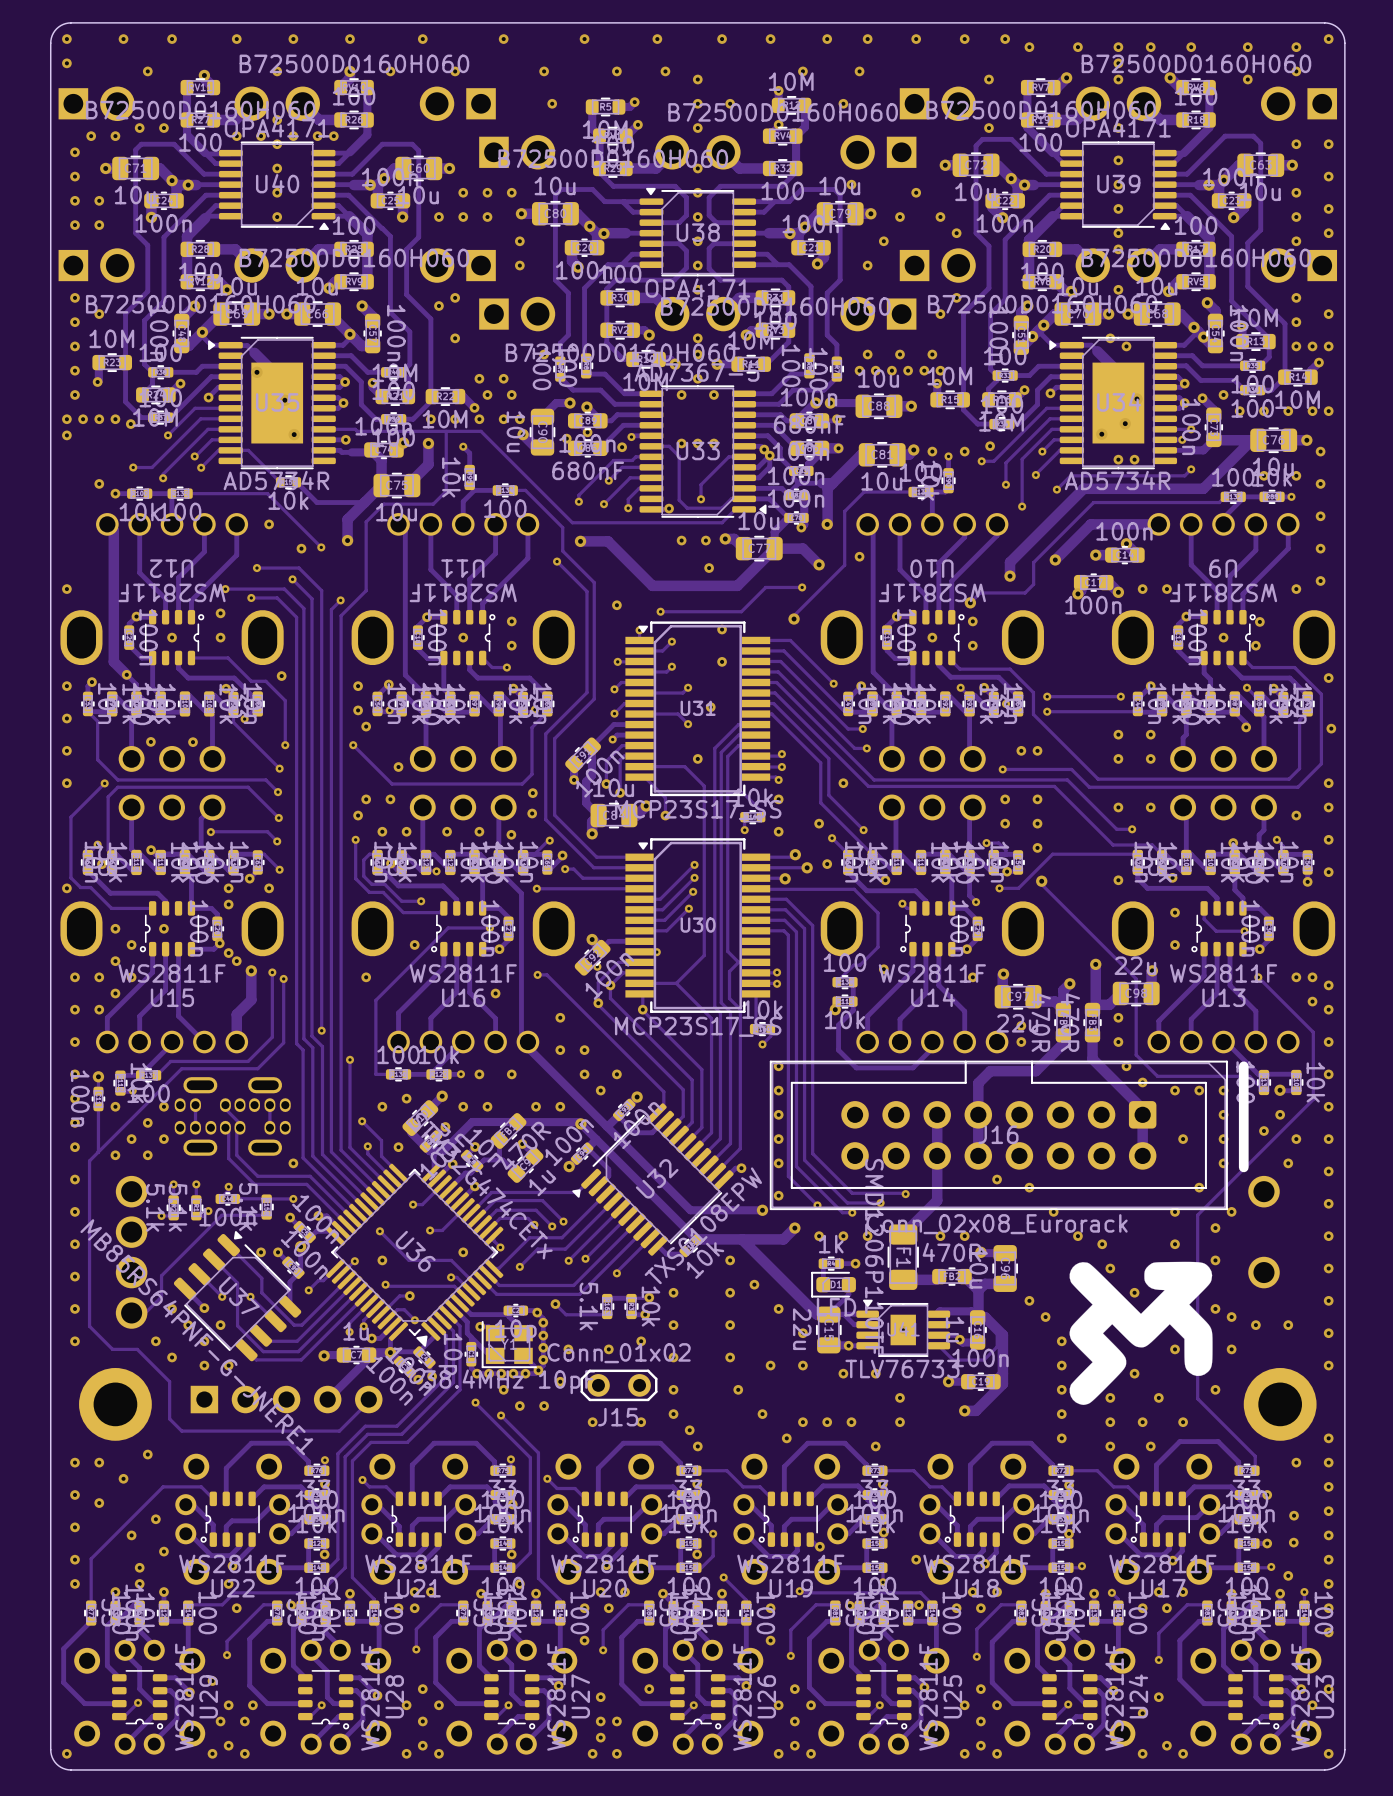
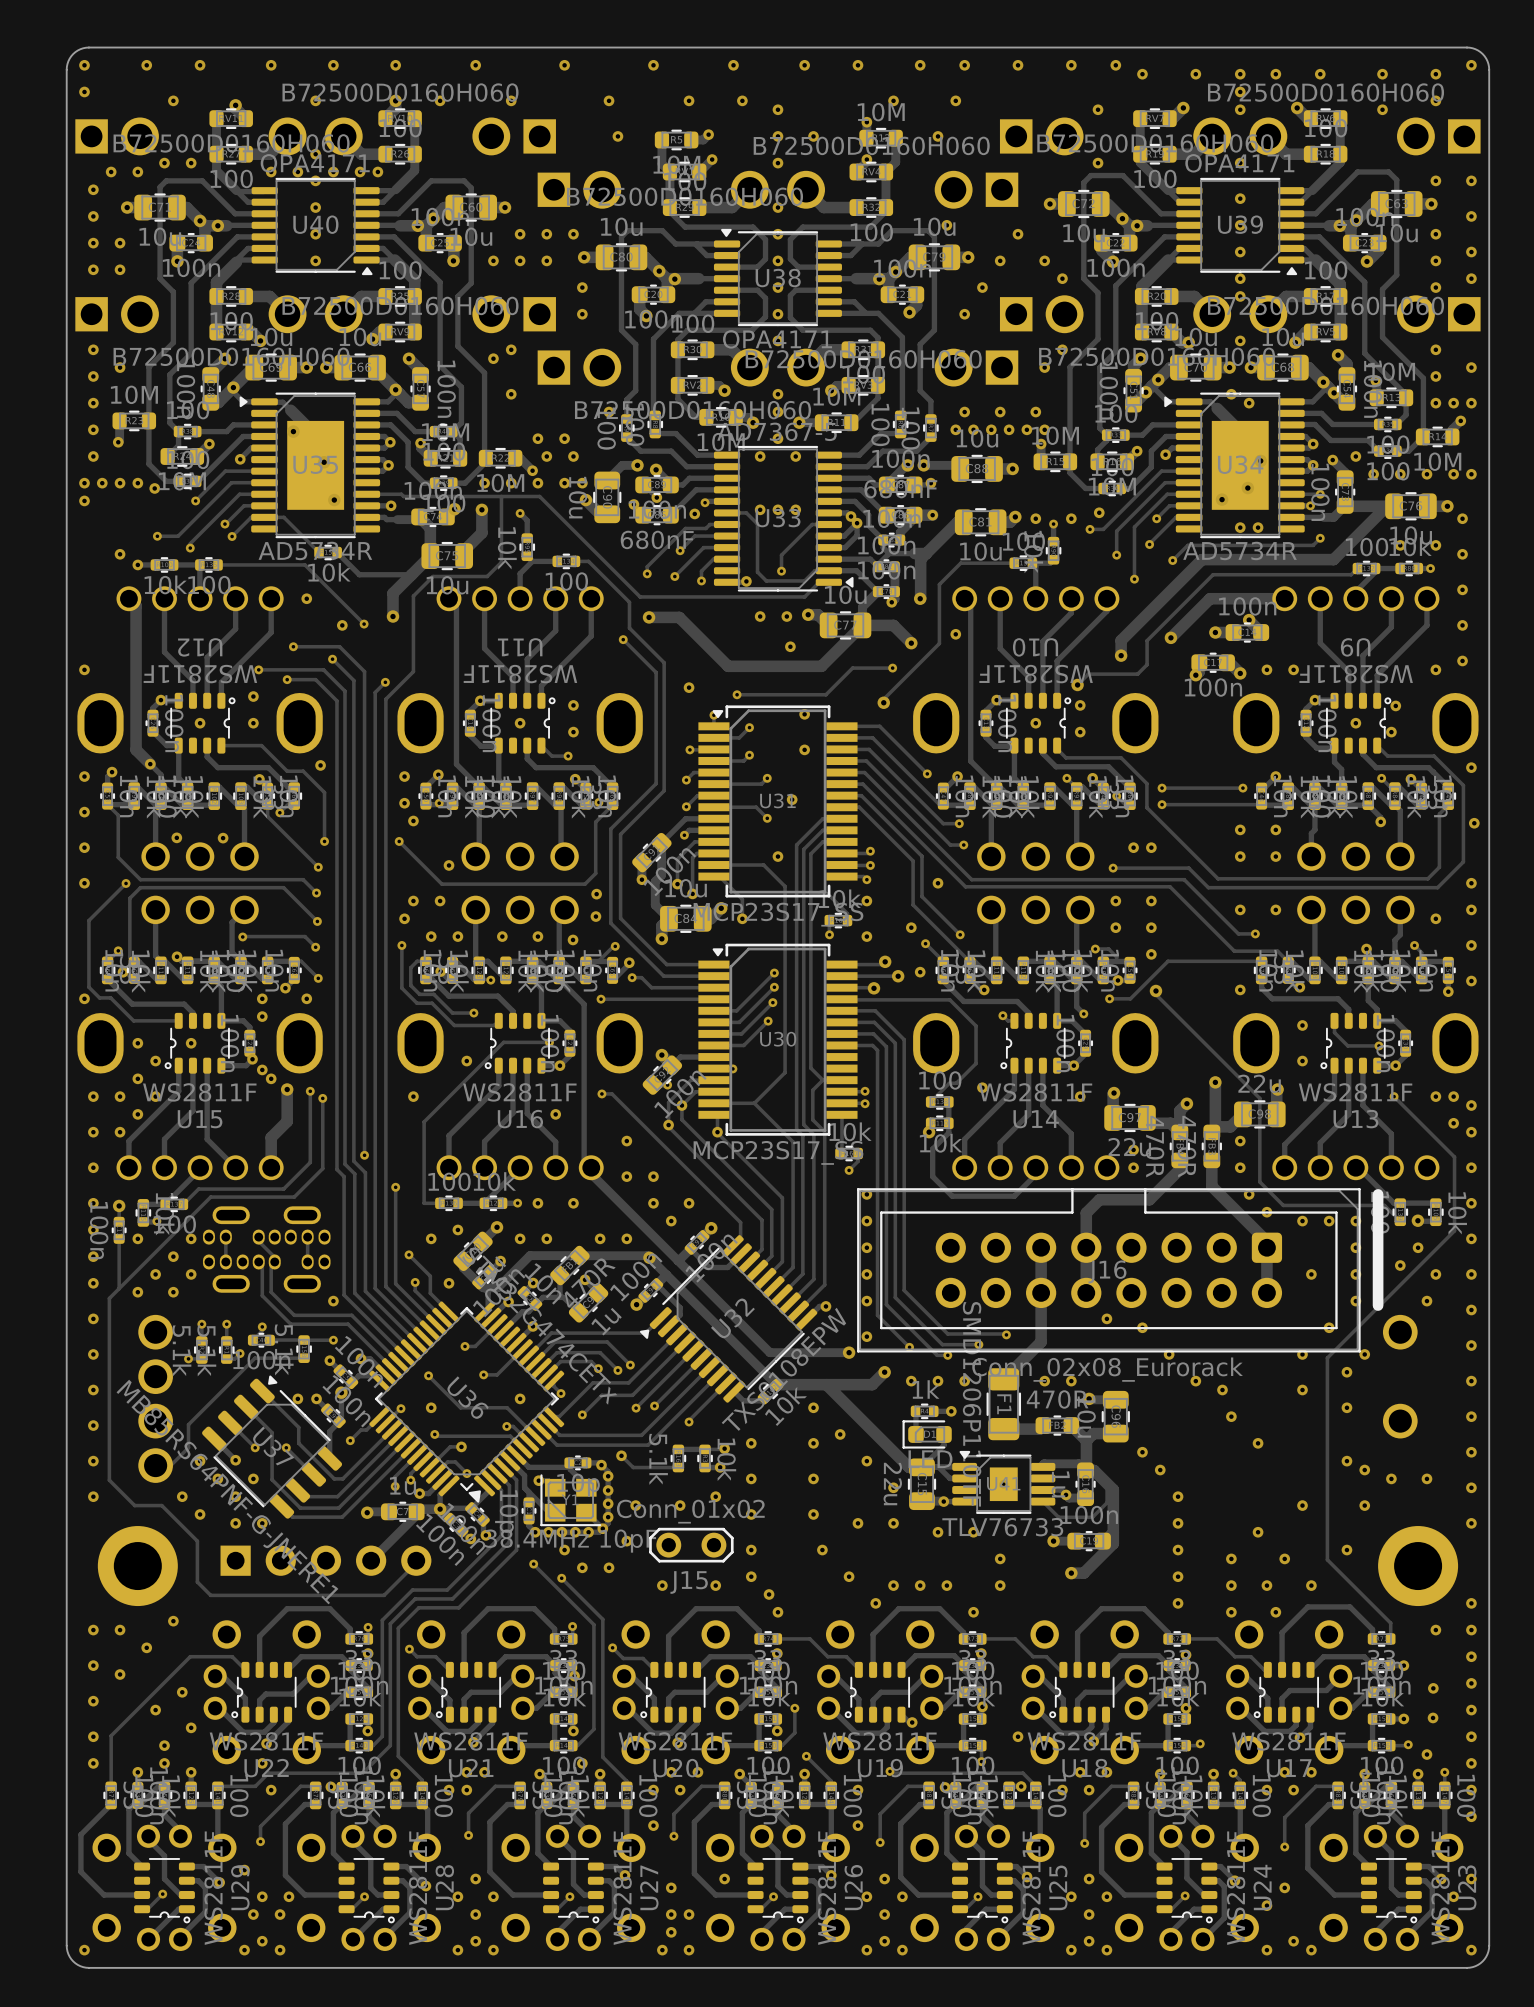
drawing: [1069, 1261, 1213, 1405] -> none

